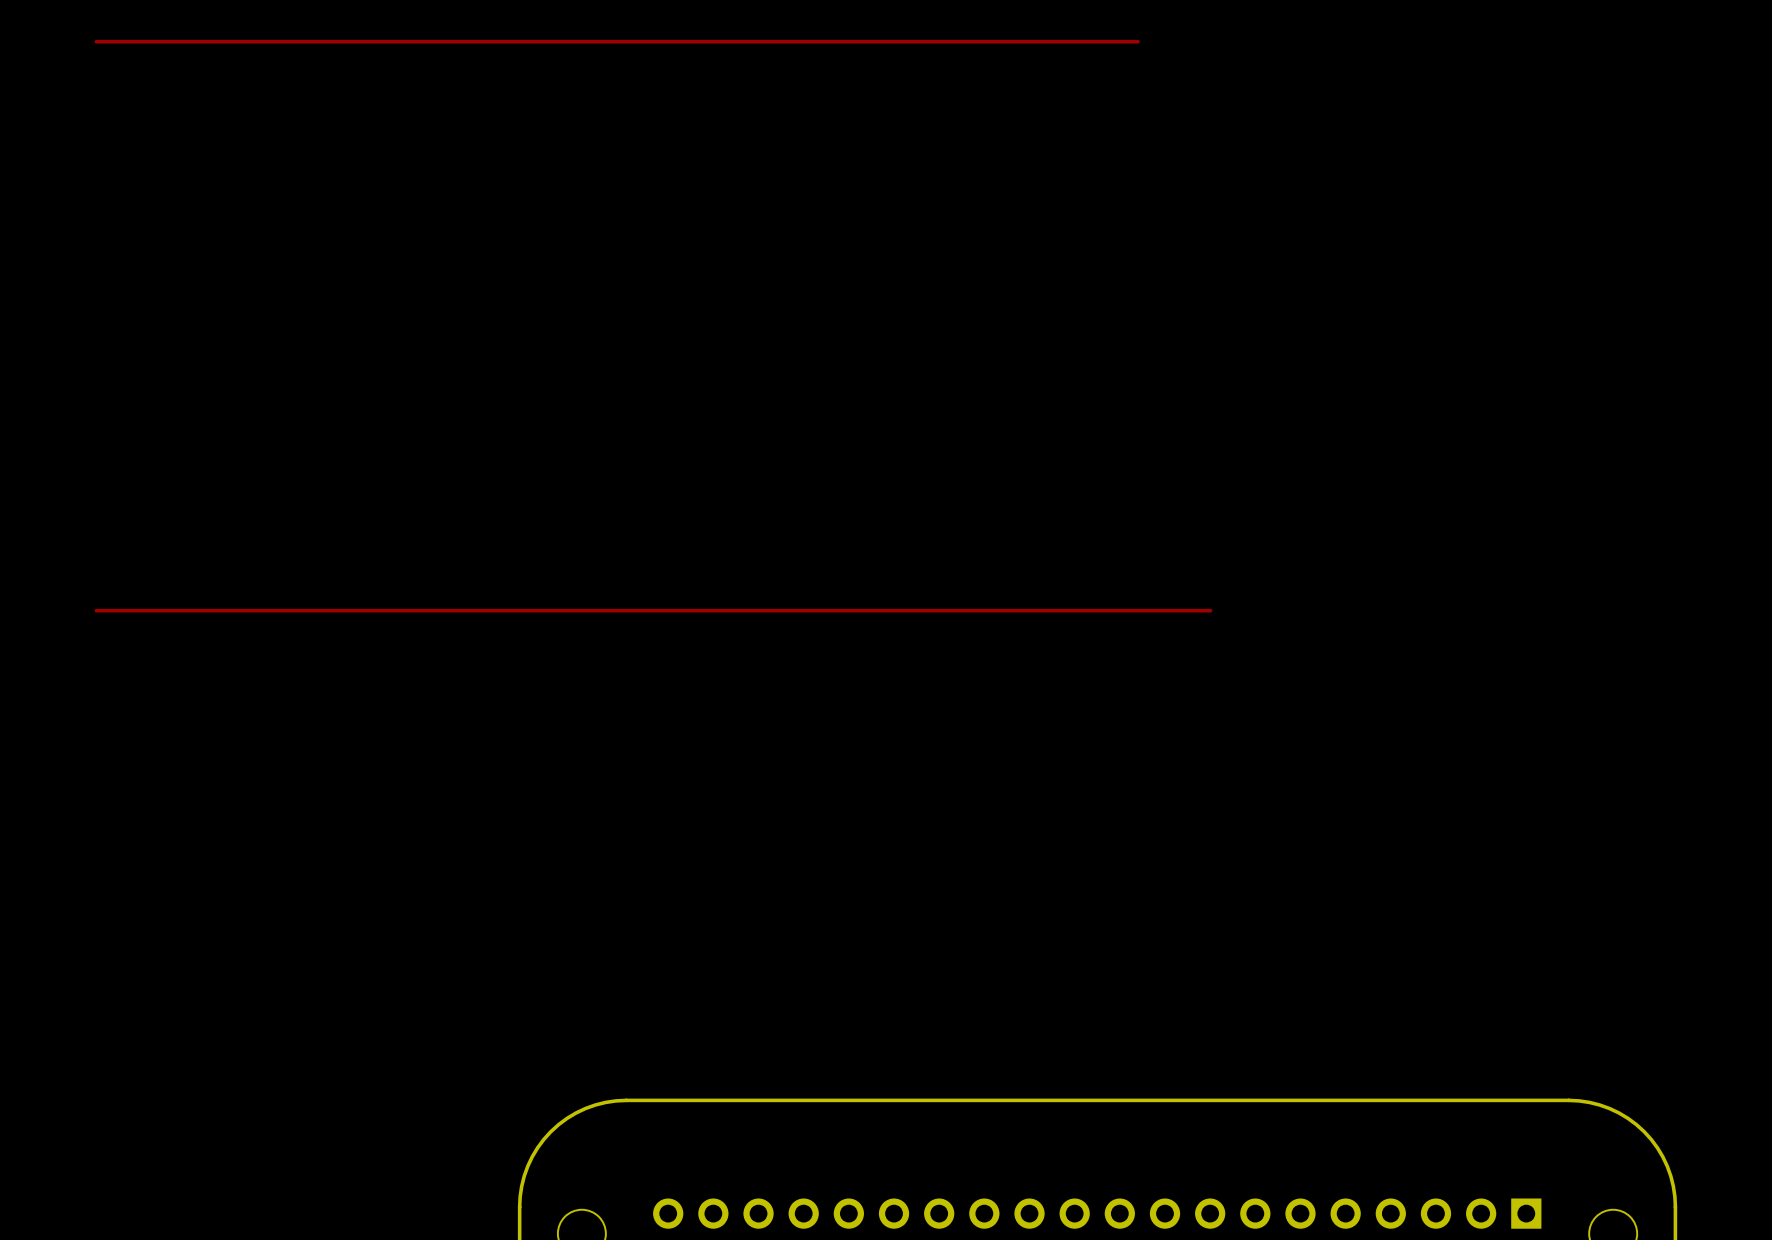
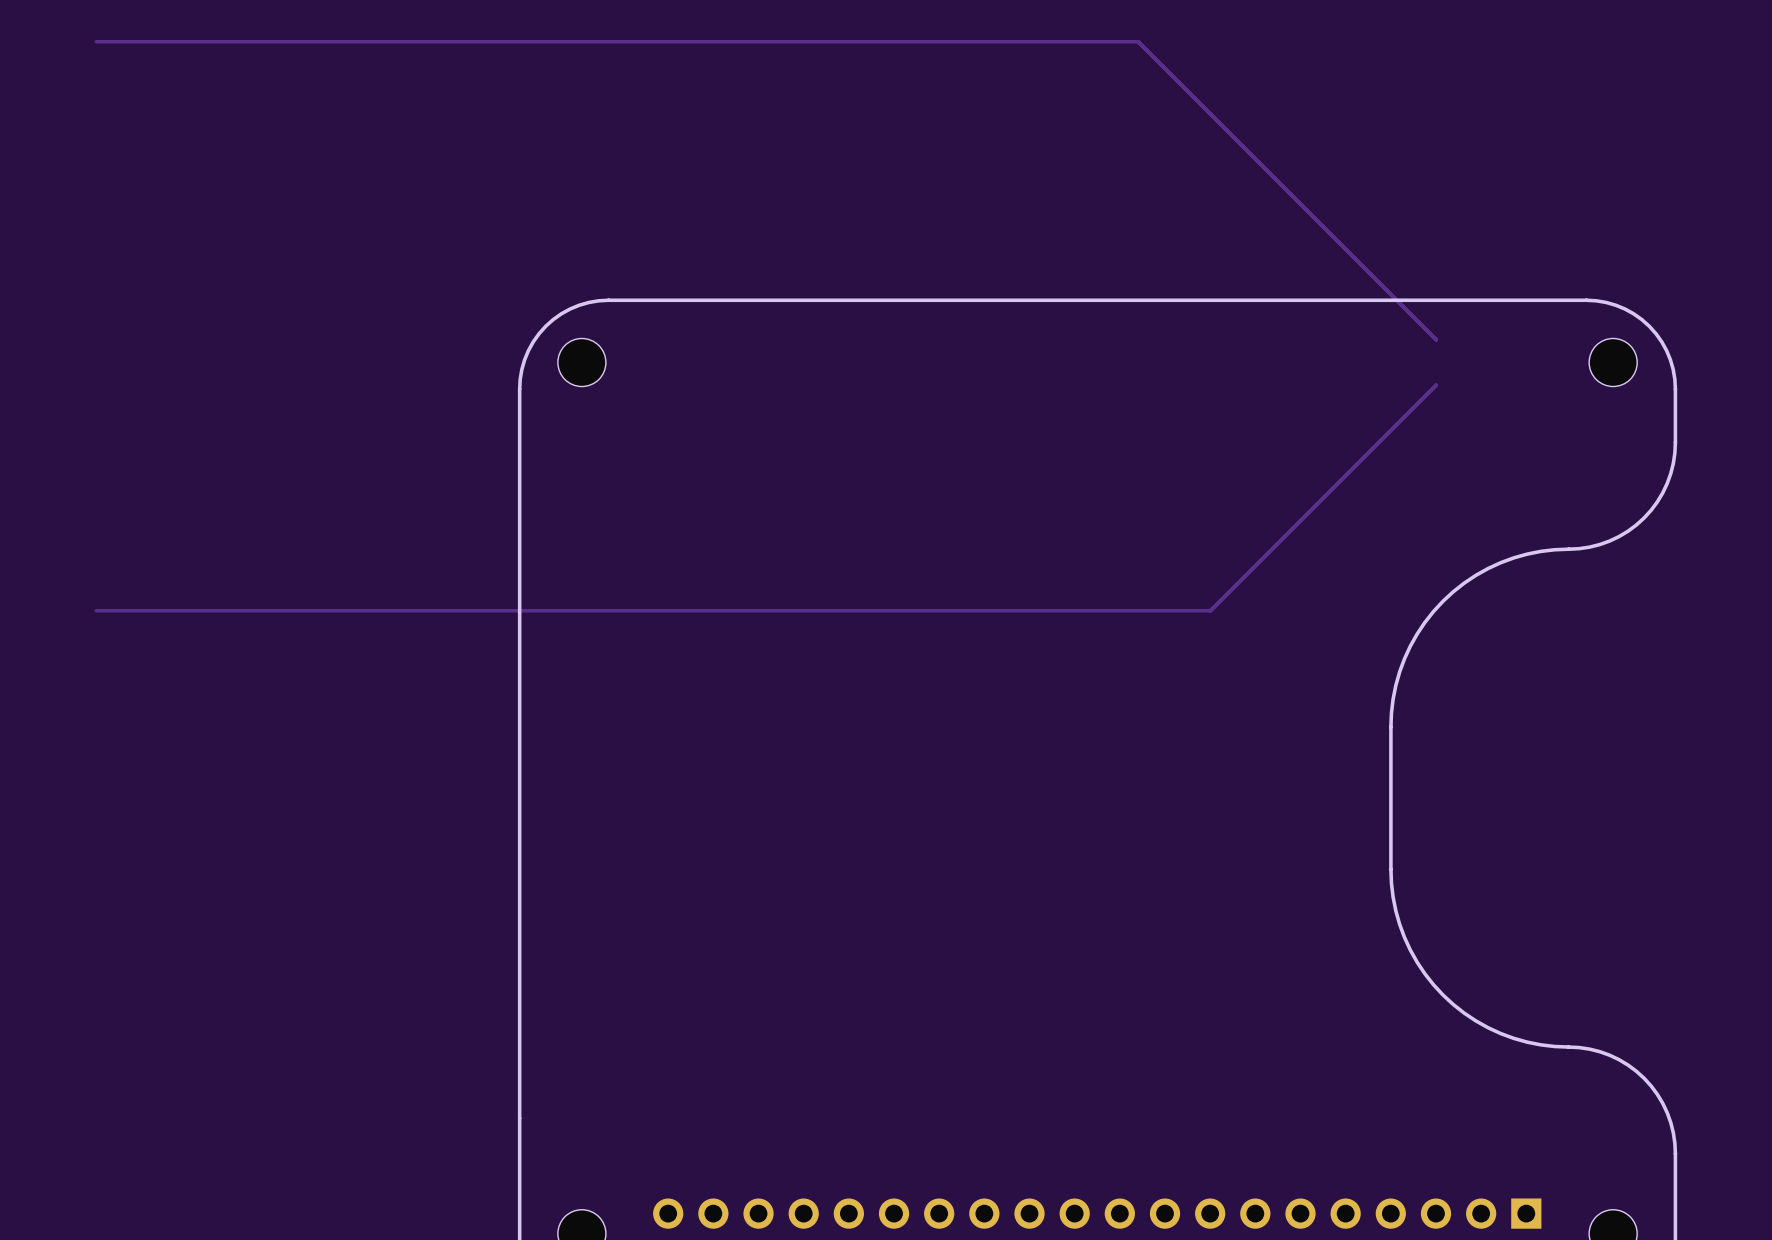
track: none -> (1138, 41) (1436, 339)
part: none -> (581, 362)
part: none -> (1613, 362)
track: none -> (1436, 385) (1210, 610)
board edge: (519, 1207) (521, 1186) (527, 1166) (537, 1147) (550, 1131) (567, 1118) (585, 1108) (605, 1102) (626, 1100) (1579, 1100) (1599, 1104) (1619, 1113) (1644, 1131) (1657, 1147) (1667, 1166) (1673, 1186) (1675, 1207) -> (519, 1207) (520, 379) (528, 350) (539, 333) (553, 319) (579, 305) (608, 300) (1586, 300) (1615, 305) (1641, 319) (1661, 341) (1670, 359) (1674, 379) (1674, 452) (1667, 483) (1651, 510) (1636, 524) (1619, 536) (1589, 547) (1540, 551) (1500, 562) (1475, 575) (1453, 591) (1424, 622) (1404, 658) (1393, 699) (1390, 727) (1390, 869) (1393, 897) (1404, 937) (1424, 973) (1453, 1004) (1487, 1027) (1513, 1038) (1540, 1044) (1589, 1049) (1609, 1055) (1636, 1071) (1651, 1086) (1667, 1112) (1673, 1132) (1675, 1207)

